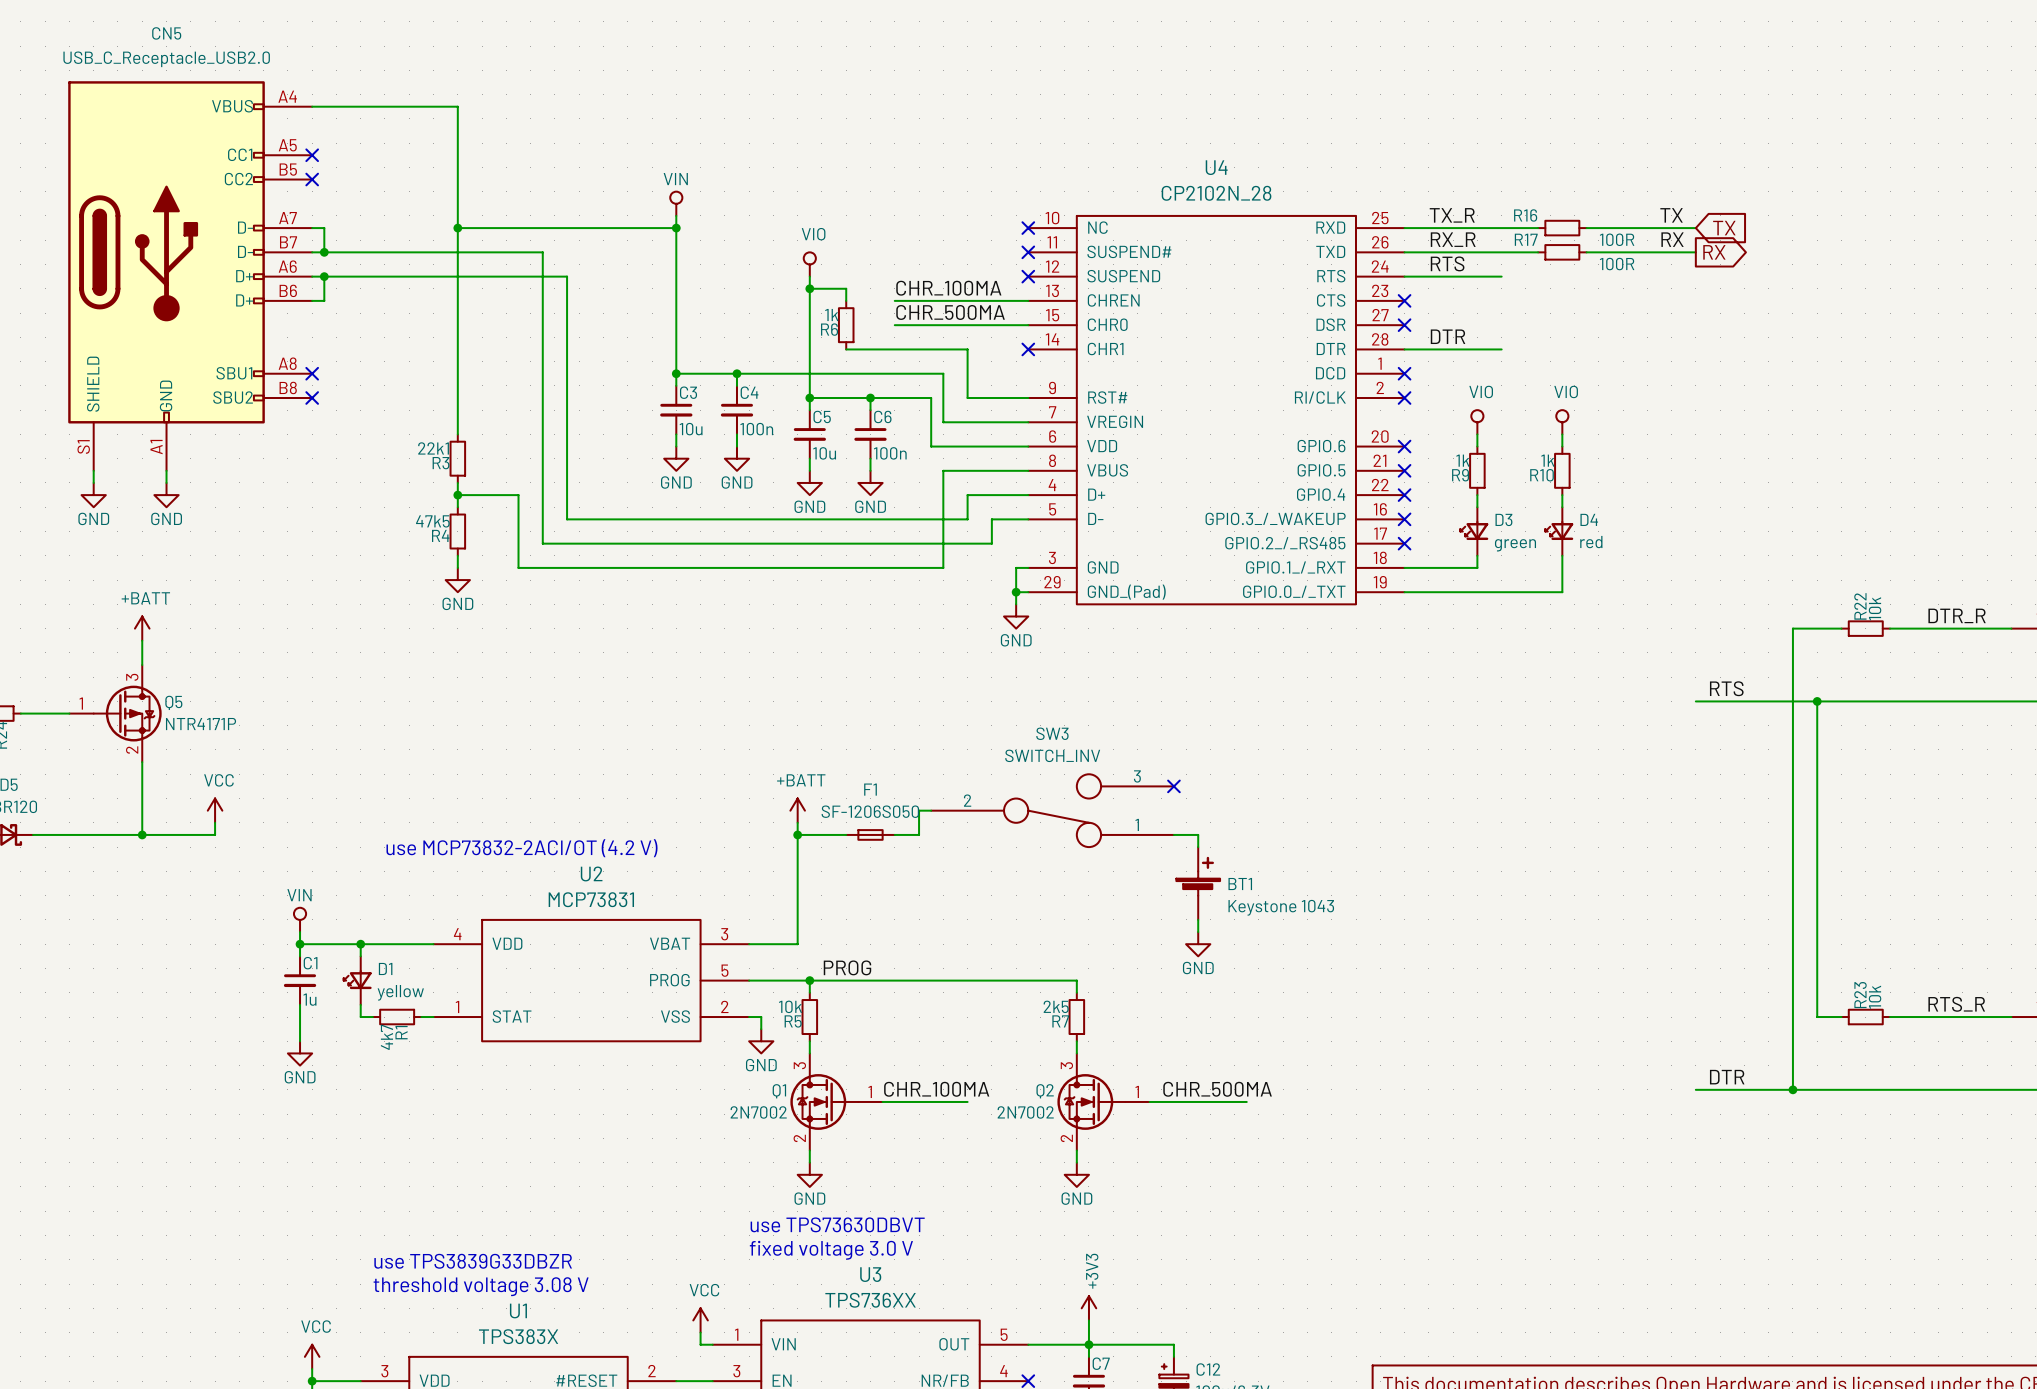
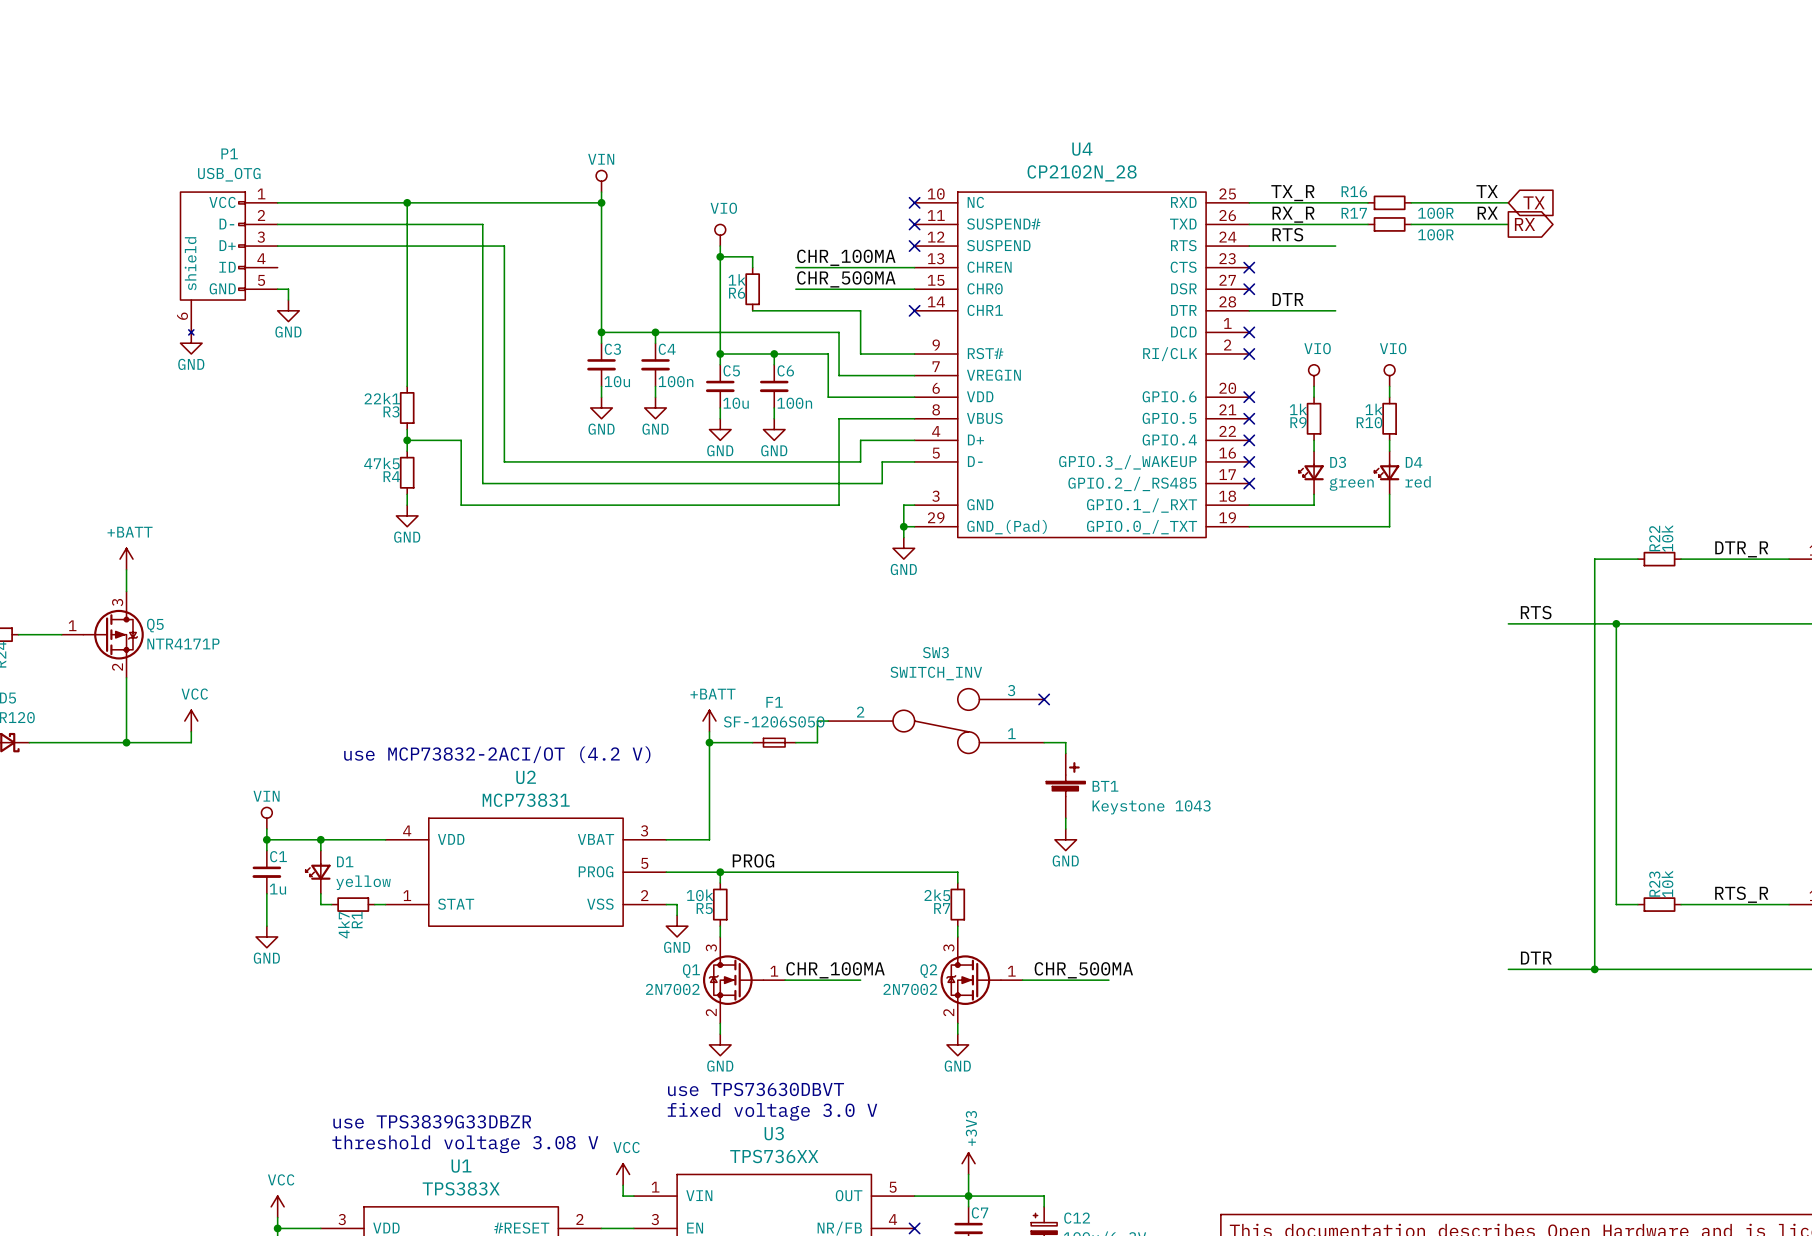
wire: (312, 106) (457, 106) (457, 228) -> (288, 202) (407, 202)
no-connect mark: (312, 155) -> none
no-connect mark: (312, 179) -> none
wire: (324, 228) (324, 252) -> none
junction: (324, 252) -> none
CN5: USB_C_Receptacle_USB2.0 (190, 276) -> none
wire: (324, 276) (324, 300) (312, 300) -> none
junction: (324, 276) -> none
P1: none -> USB_OTG (229, 263)
wire: none -> (277, 289) (288, 289) (288, 300)
power symbol: none -> GND (288, 310)
no-connect mark: (312, 373) -> none
power symbol: none -> GND (191, 343)
no-connect mark: (312, 398) -> none
wire: (93, 470) (93, 482) -> none
wire: (166, 470) (166, 482) -> none
power symbol: GND (93, 495) -> none
power symbol: GND (166, 495) -> none

